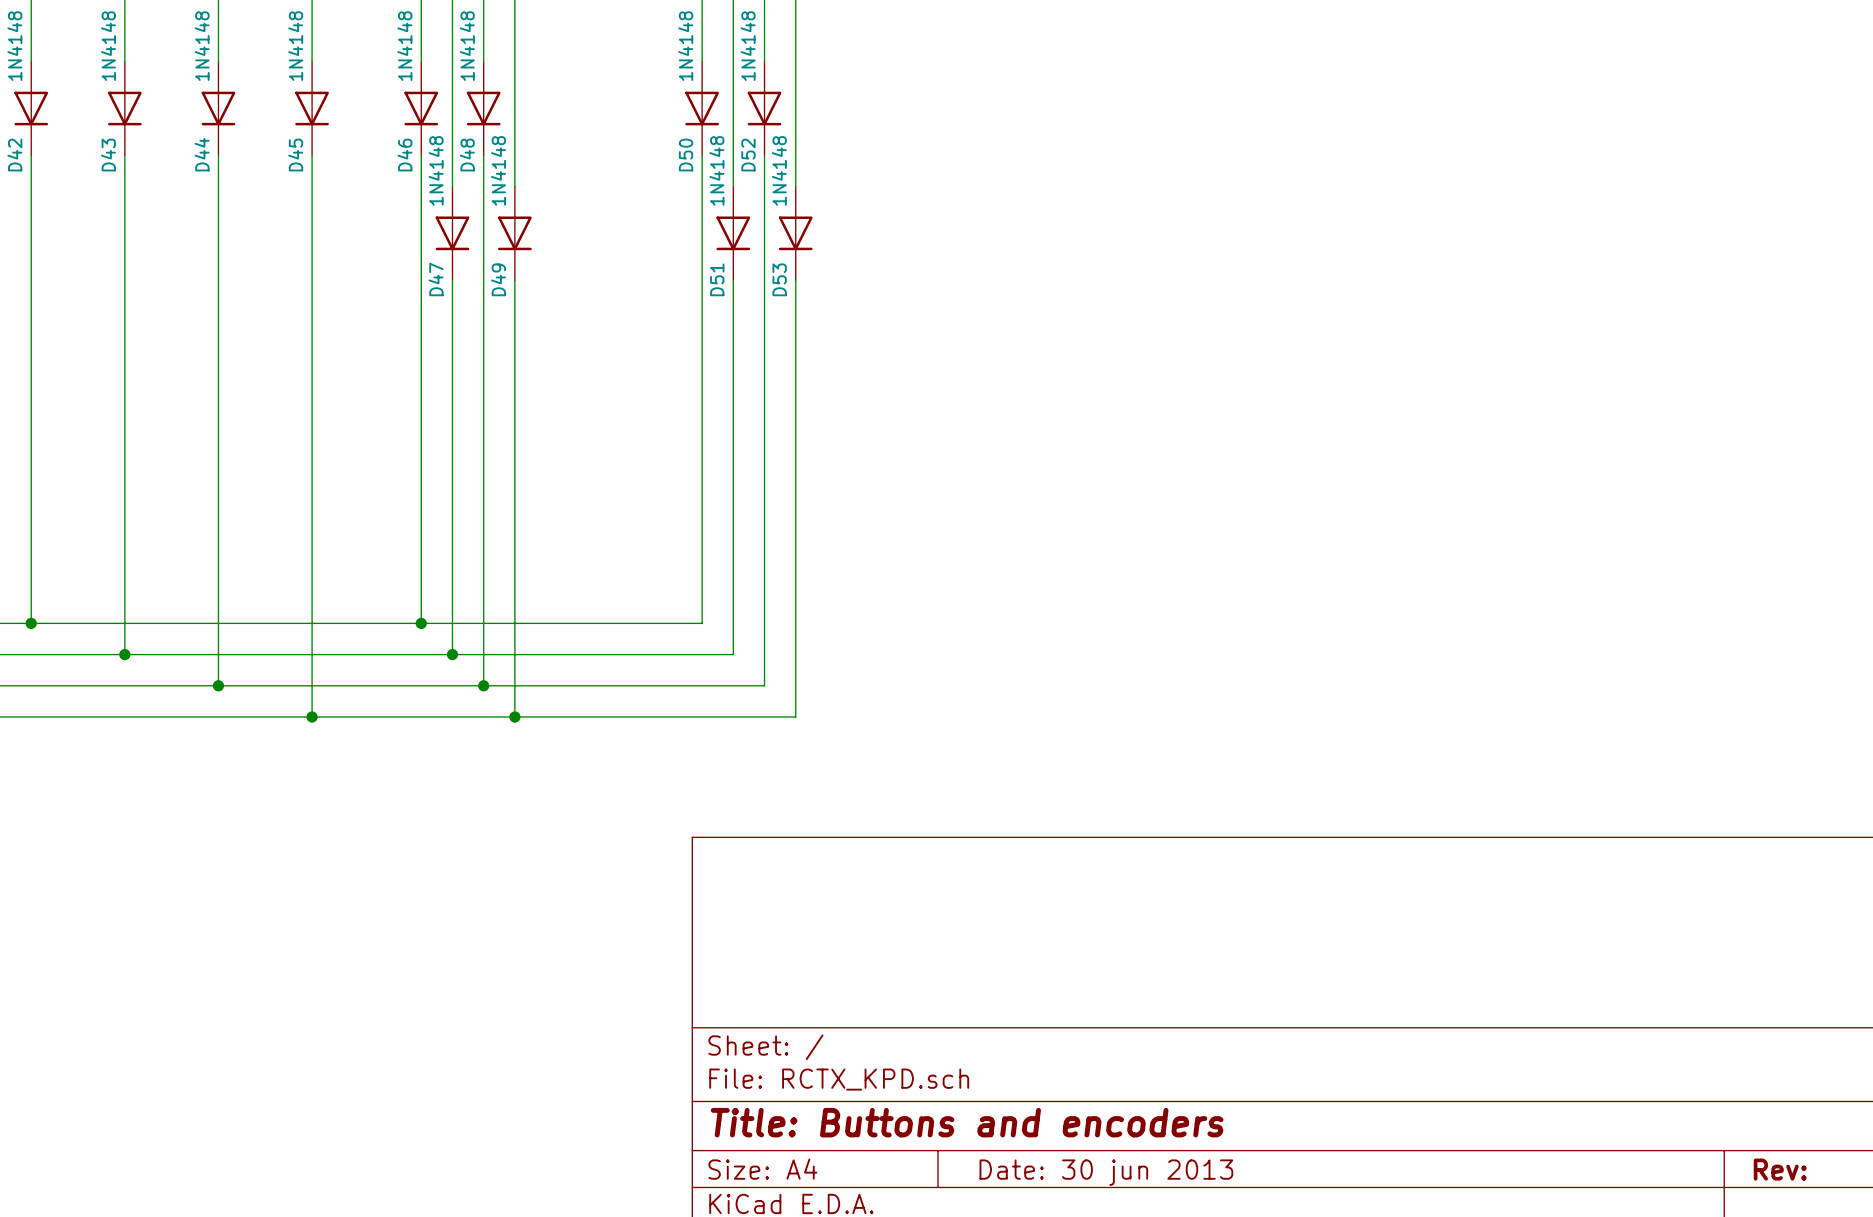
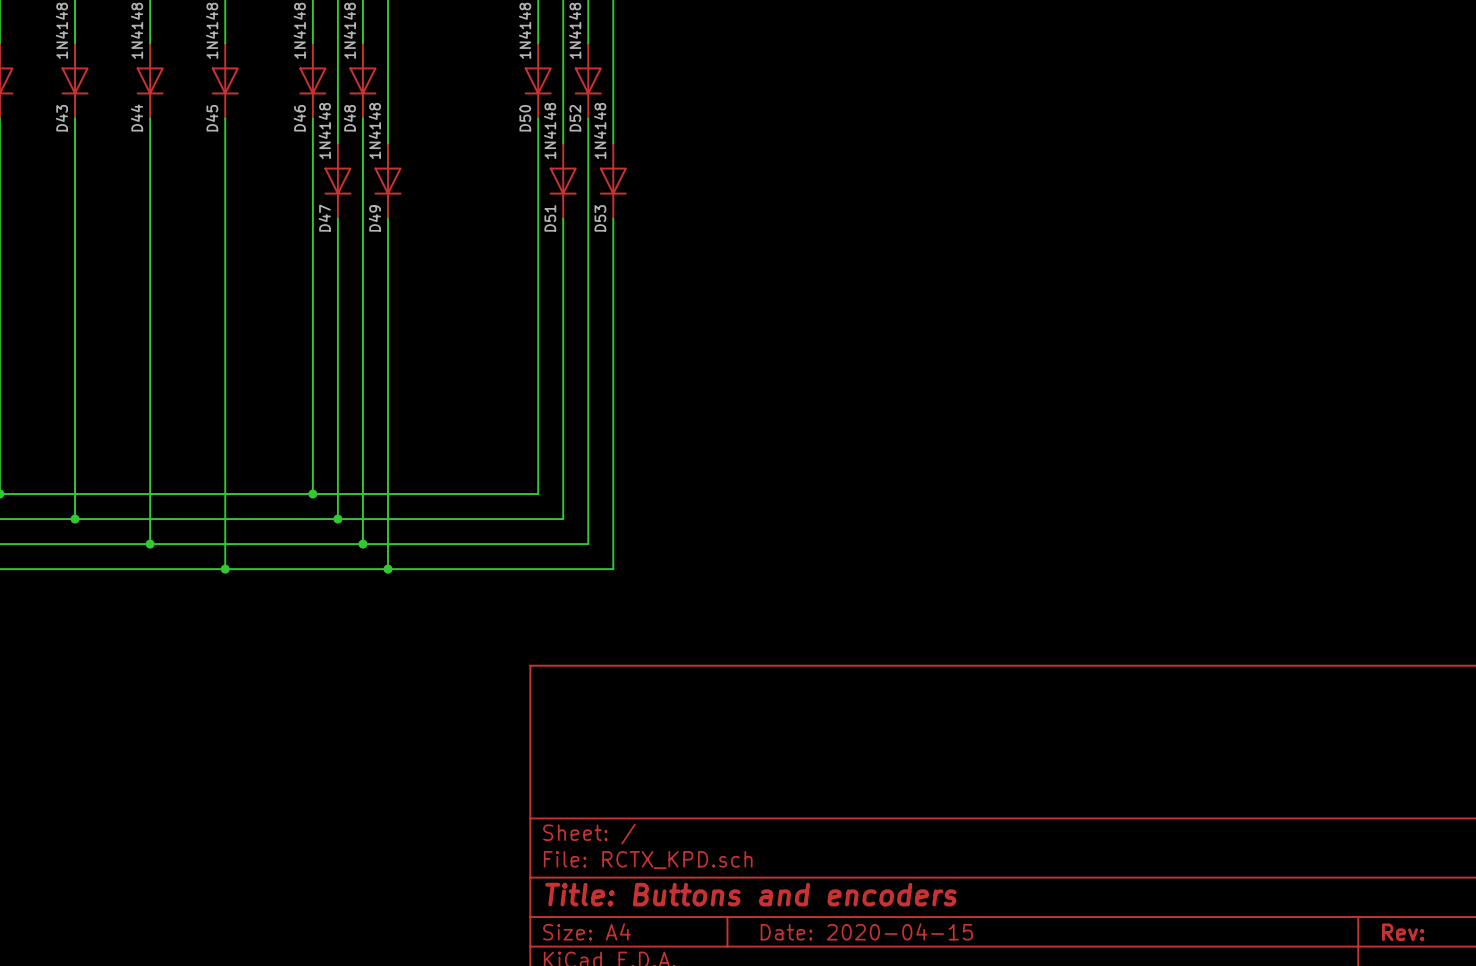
title block: Date: 30 jun 2013 (1106, 1172) -> Date: 2020-04-15 (866, 931)

